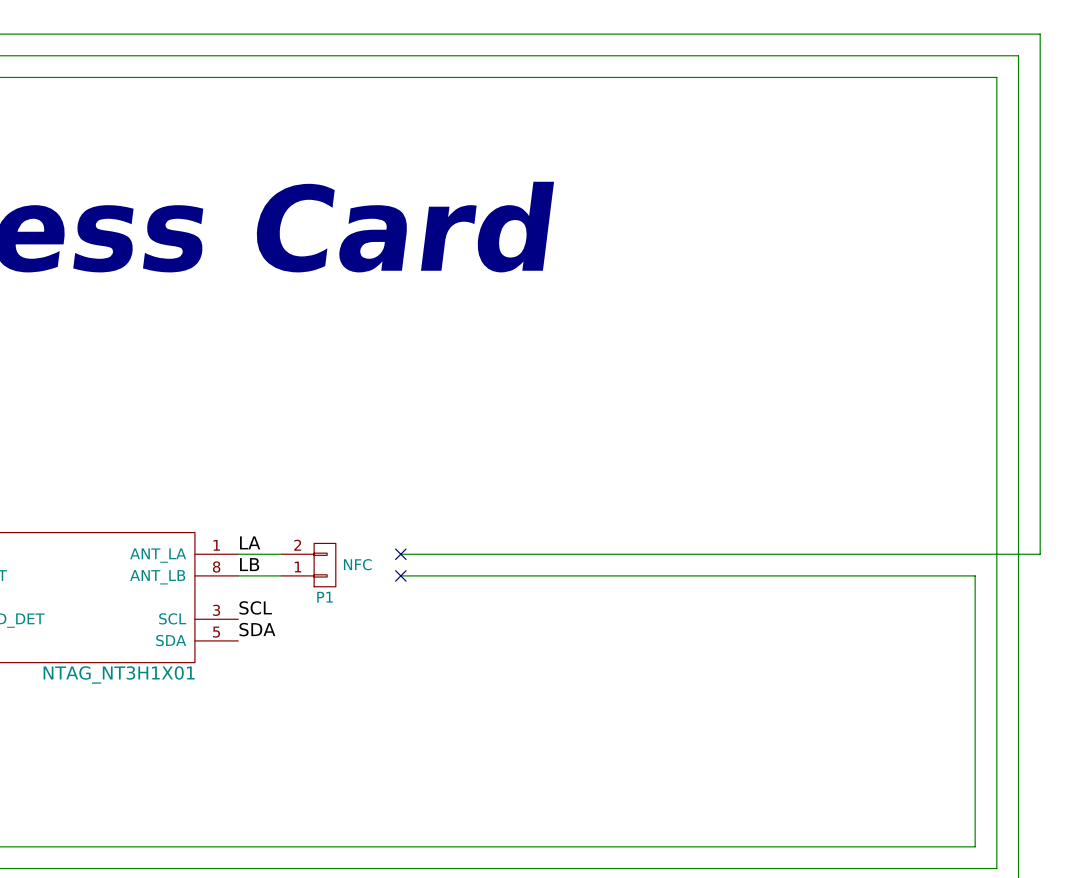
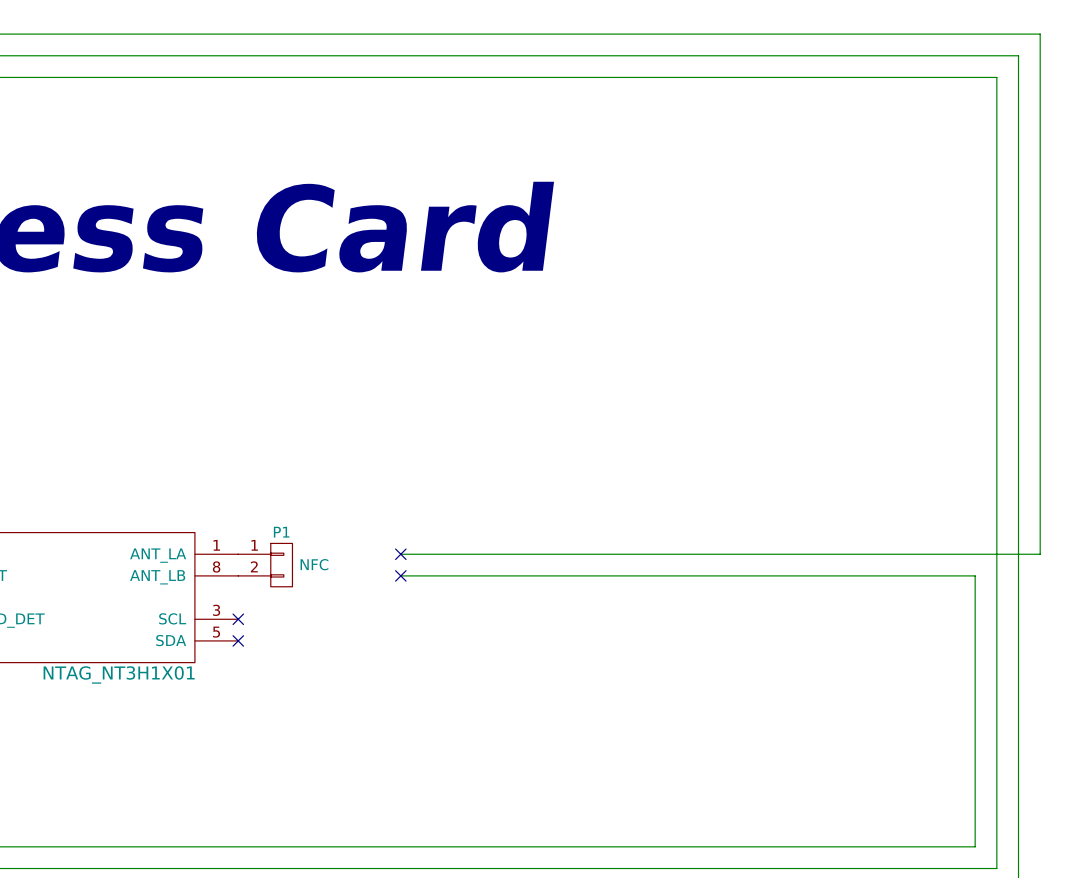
label: LA (250, 542) -> none
label: LB (249, 564) -> none
P1 position: (308, 565) -> (265, 565)
P1 flip: as is (324, 565) -> up-down (281, 565)
label: SCL (255, 607) -> none
no-connect mark: none -> (238, 619)
label: SDA (257, 629) -> none
no-connect mark: none -> (238, 640)

